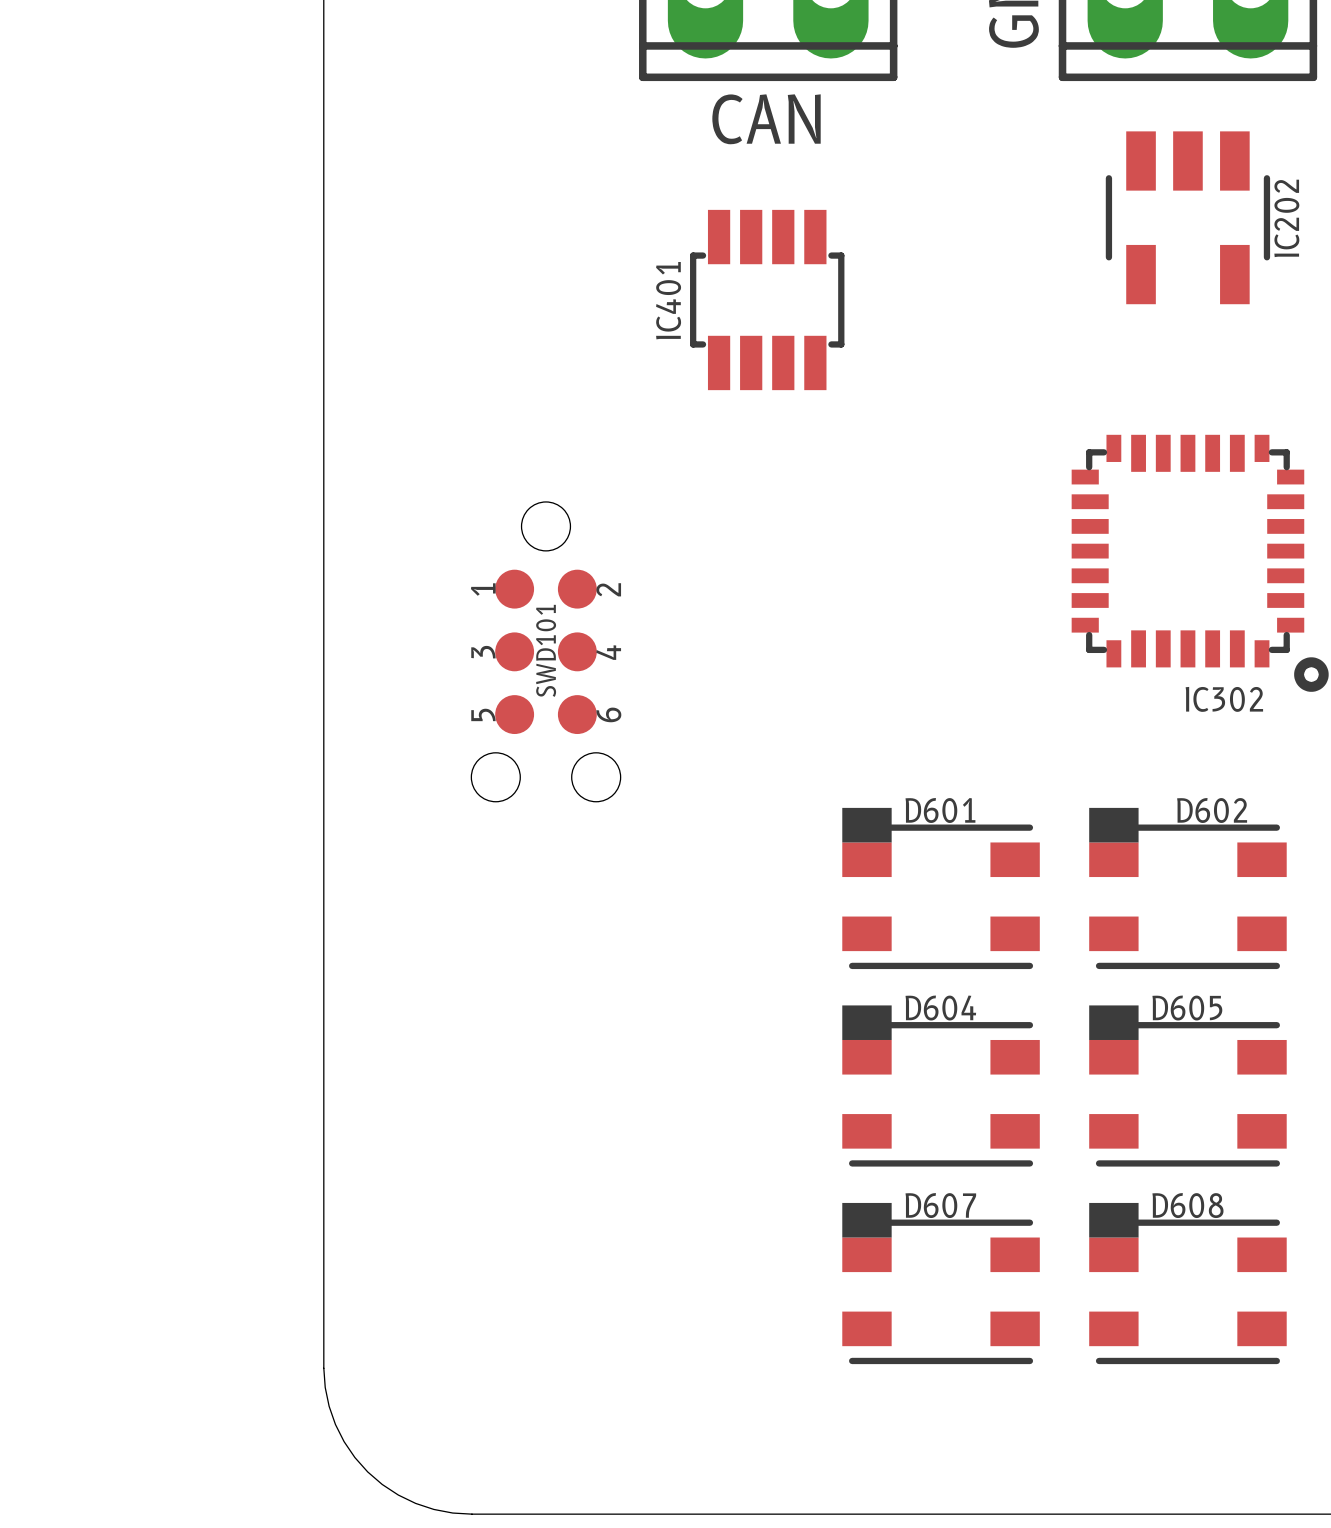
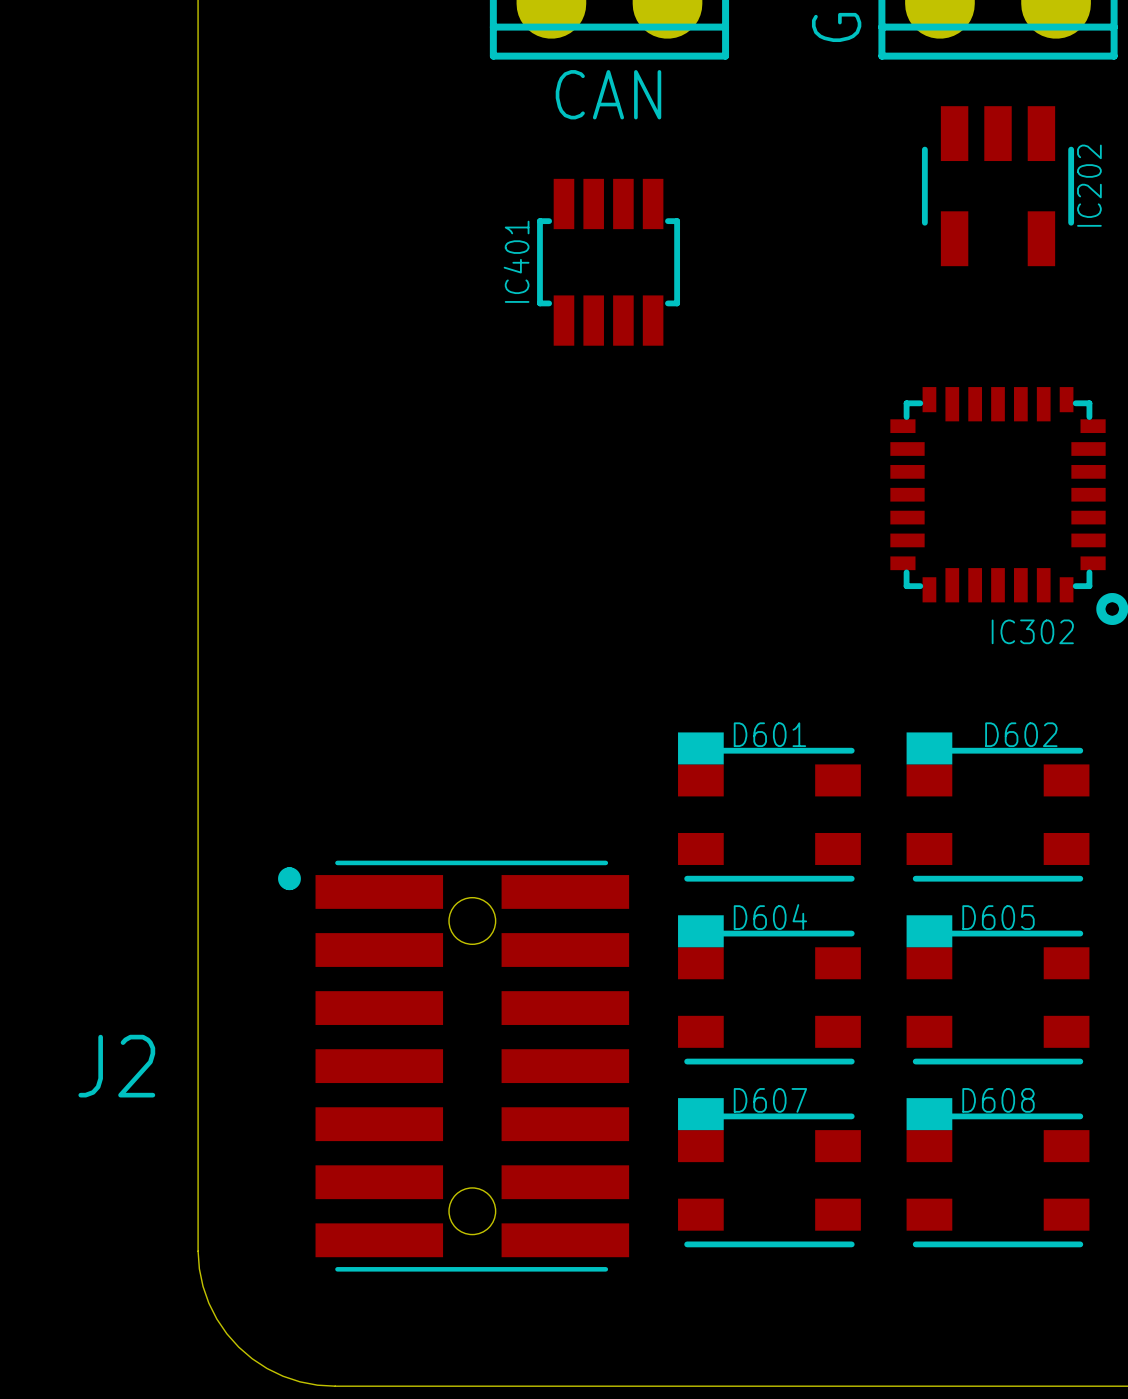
SWD101: (545, 651) -> none
J2: none -> (453, 1066)

